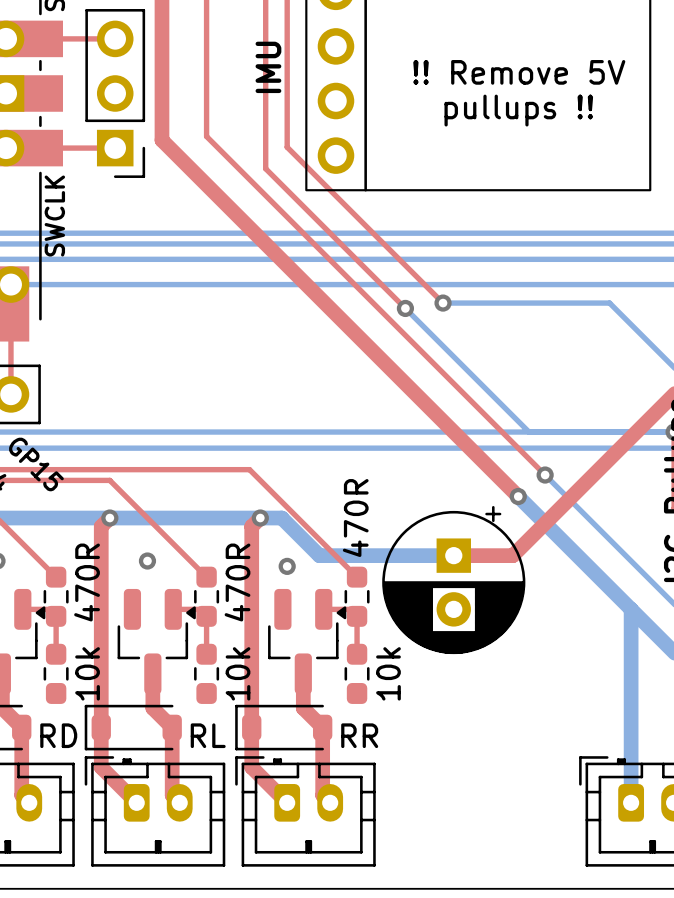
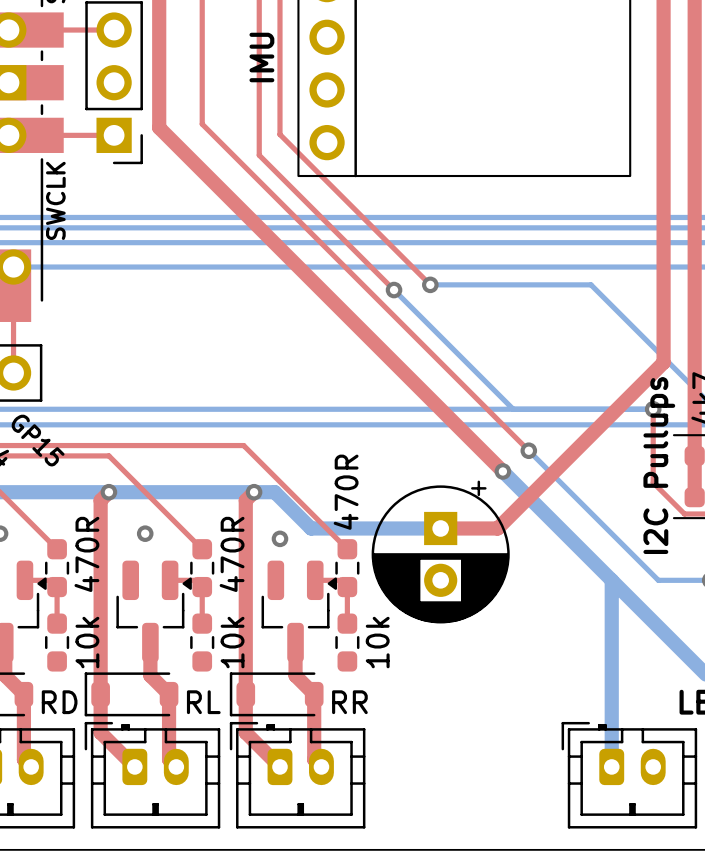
text: !! Remove 5V (519, 72) -> none
text: pullups !! (518, 110) -> none

